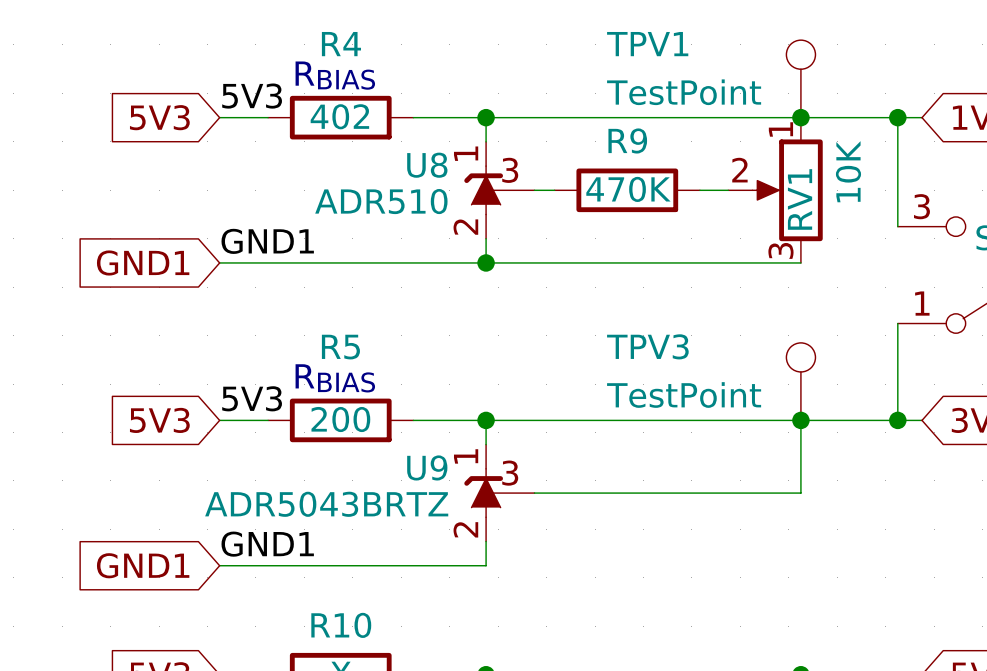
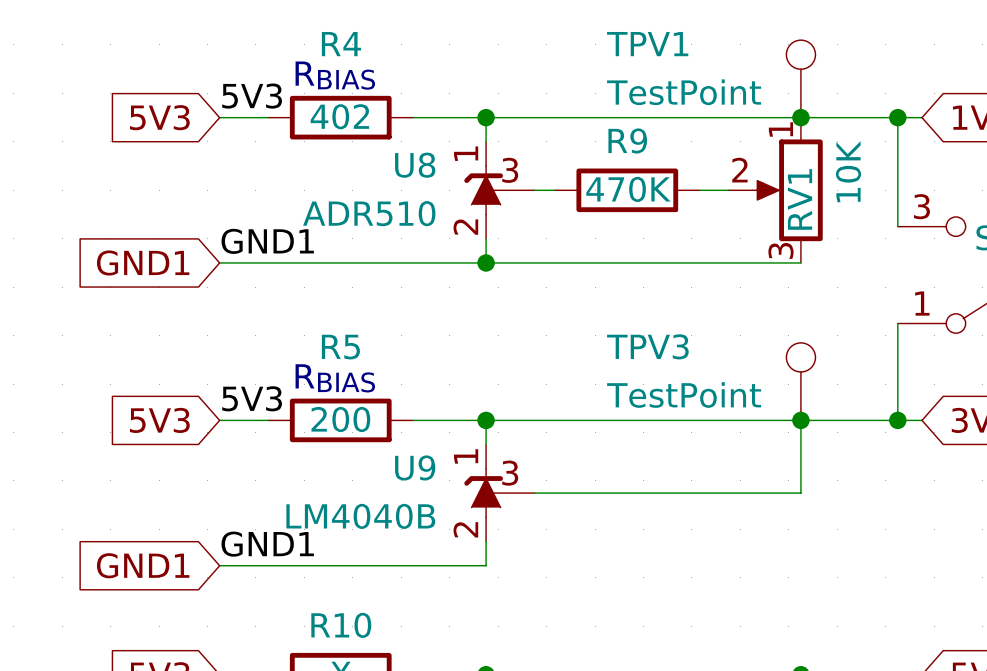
U8 name position: U8 (427, 165) -> U8 (415, 165)
U8 value position: ADR510 (381, 201) -> ADR510 (369, 213)
U9 name position: U9 (427, 467) -> U9 (415, 467)
U9 value: ADR5043BRTZ (326, 504) -> LM4040B (360, 516)

